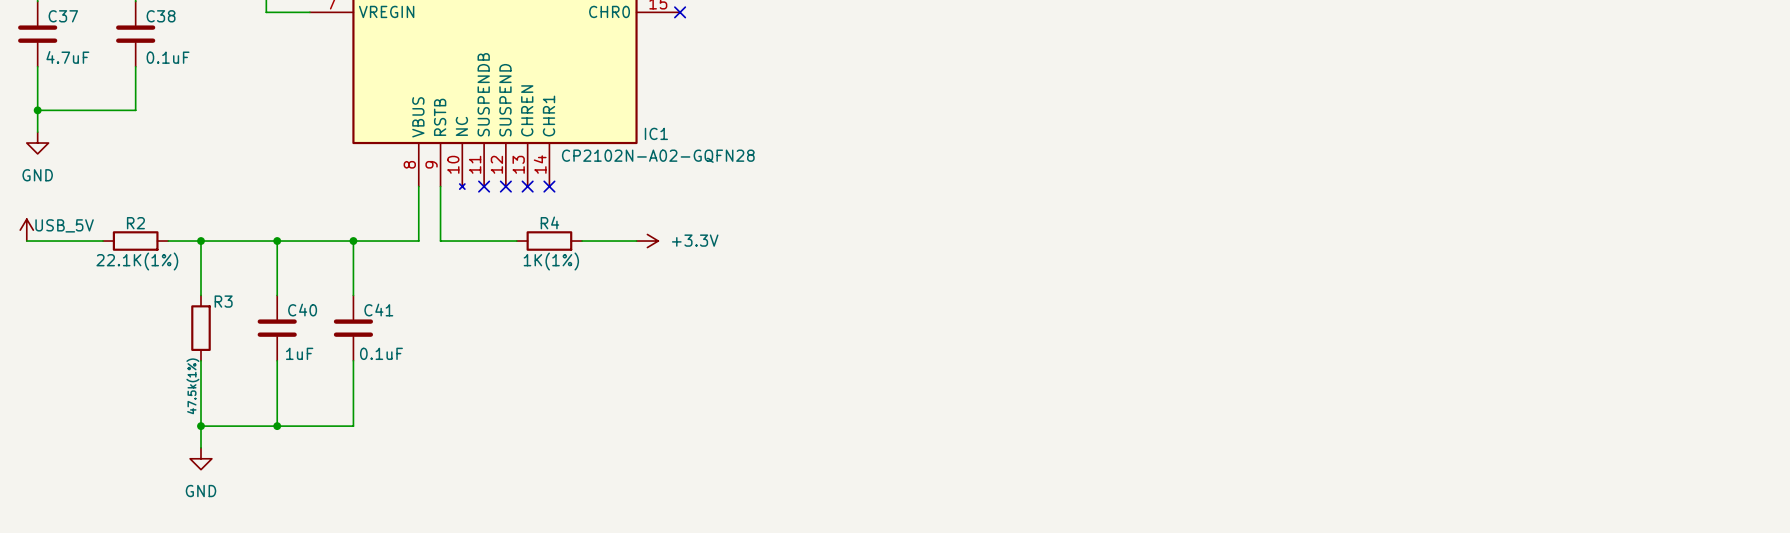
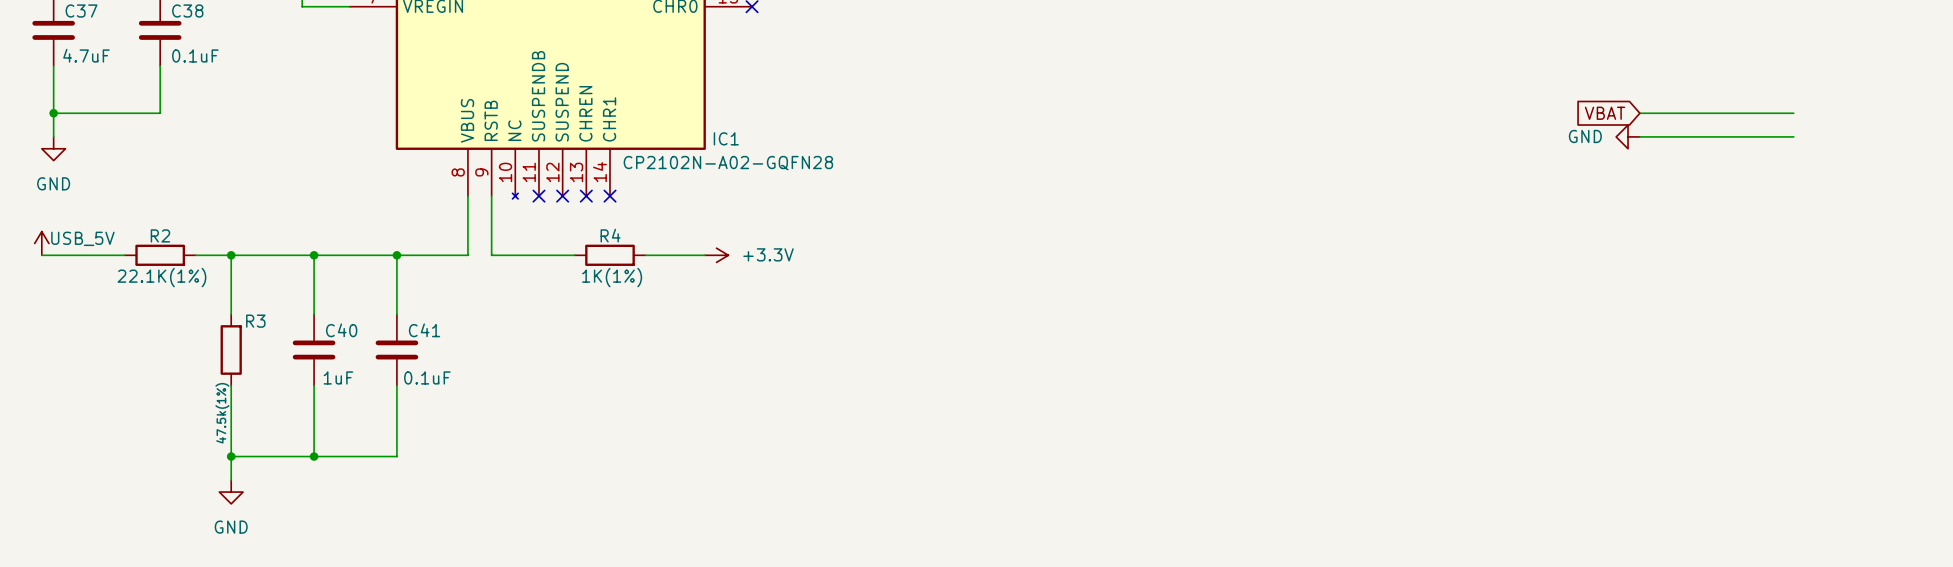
global label: none -> VBAT (1605, 113)
wire: none -> (1639, 113) (1793, 113)
power symbol: none -> GND (1628, 136)
wire: none -> (1639, 136) (1793, 136)

